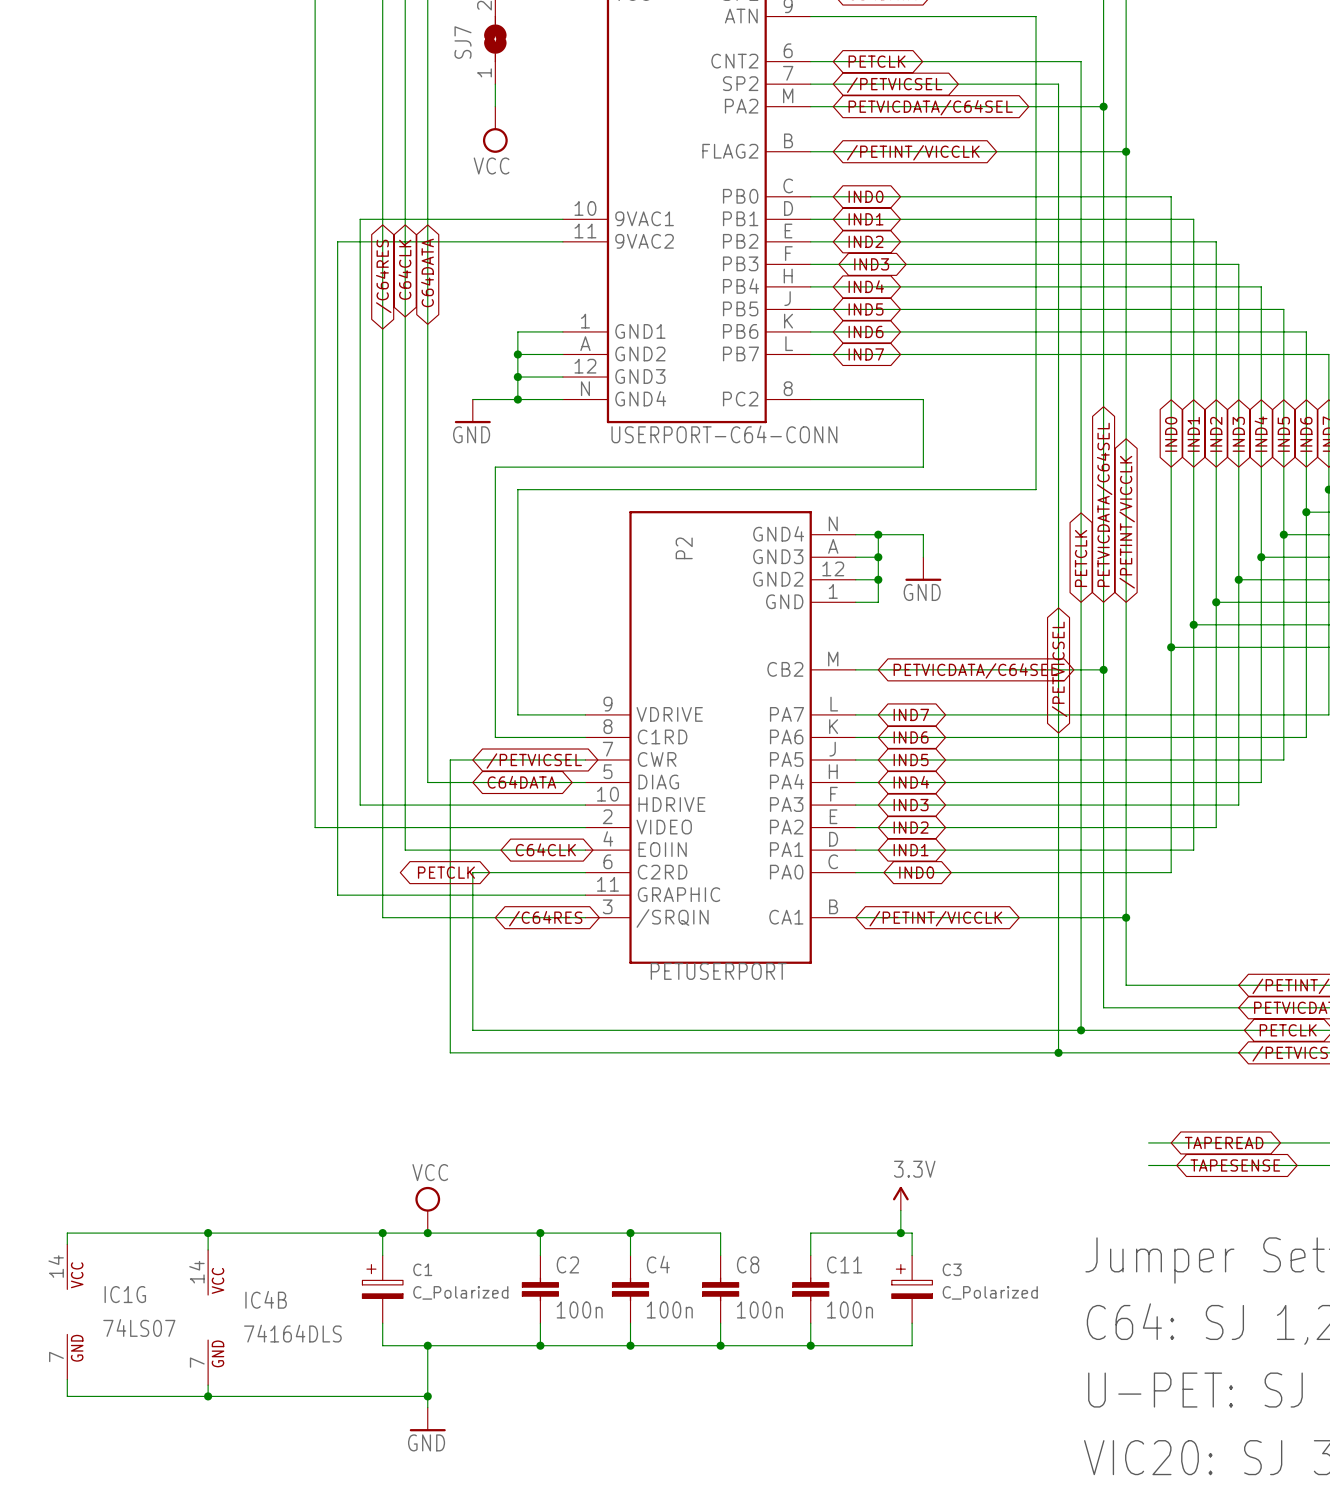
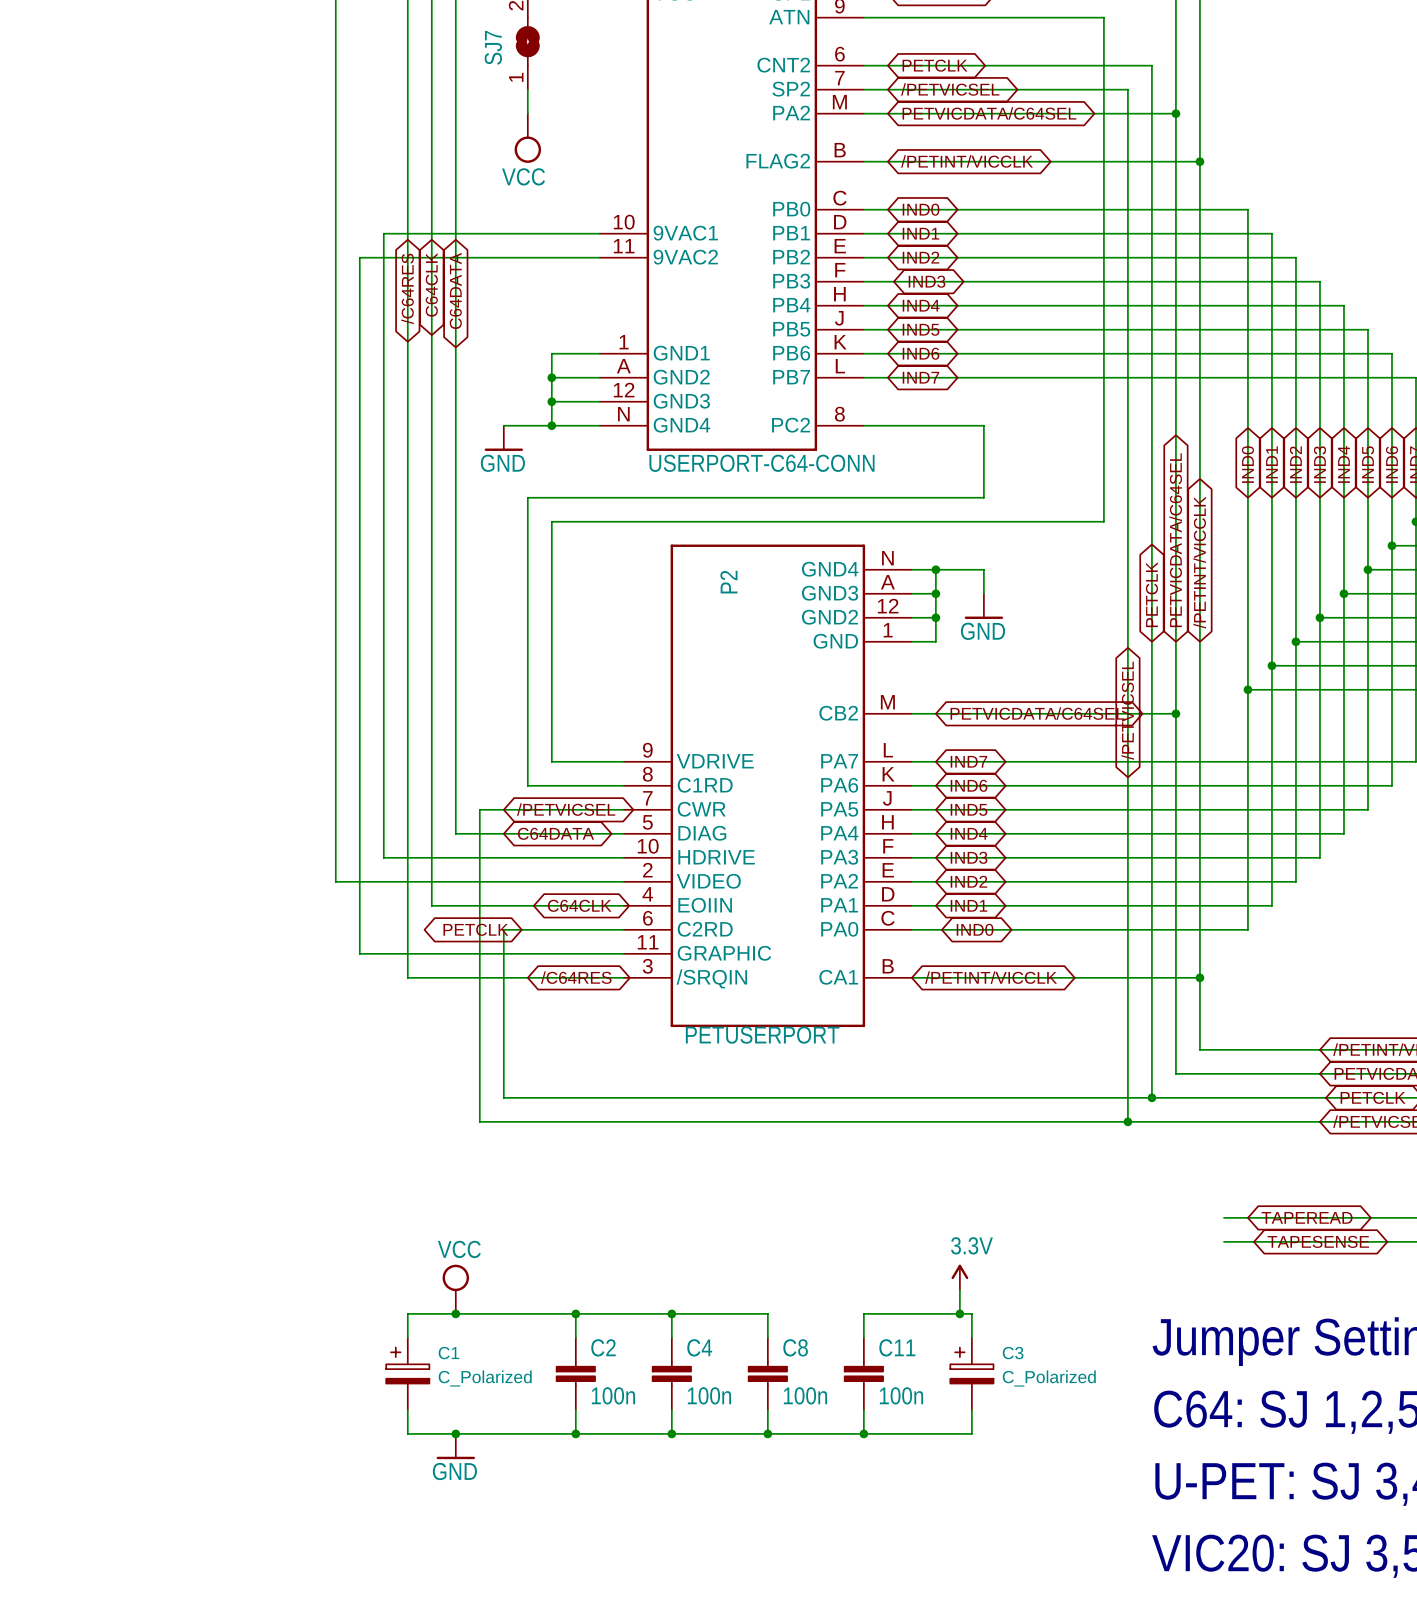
wire: (208, 1233) (208, 1249) -> none
junction: (208, 1233) -> none
wire: (382, 1233) (67, 1233) (67, 1244) -> none
junction: (382, 1233) -> none
IC1G: 74LS07 (67, 1311) -> none
IC4B: 74164DLS (208, 1317) -> none
wire: (427, 1345) (427, 1407) -> none
wire: (67, 1379) (67, 1396) (427, 1396) -> none
wire: (208, 1385) (208, 1396) -> none
junction: (208, 1396) -> none
junction: (427, 1396) -> none
power symbol position: GND (427, 1419) -> GND (455, 1446)

